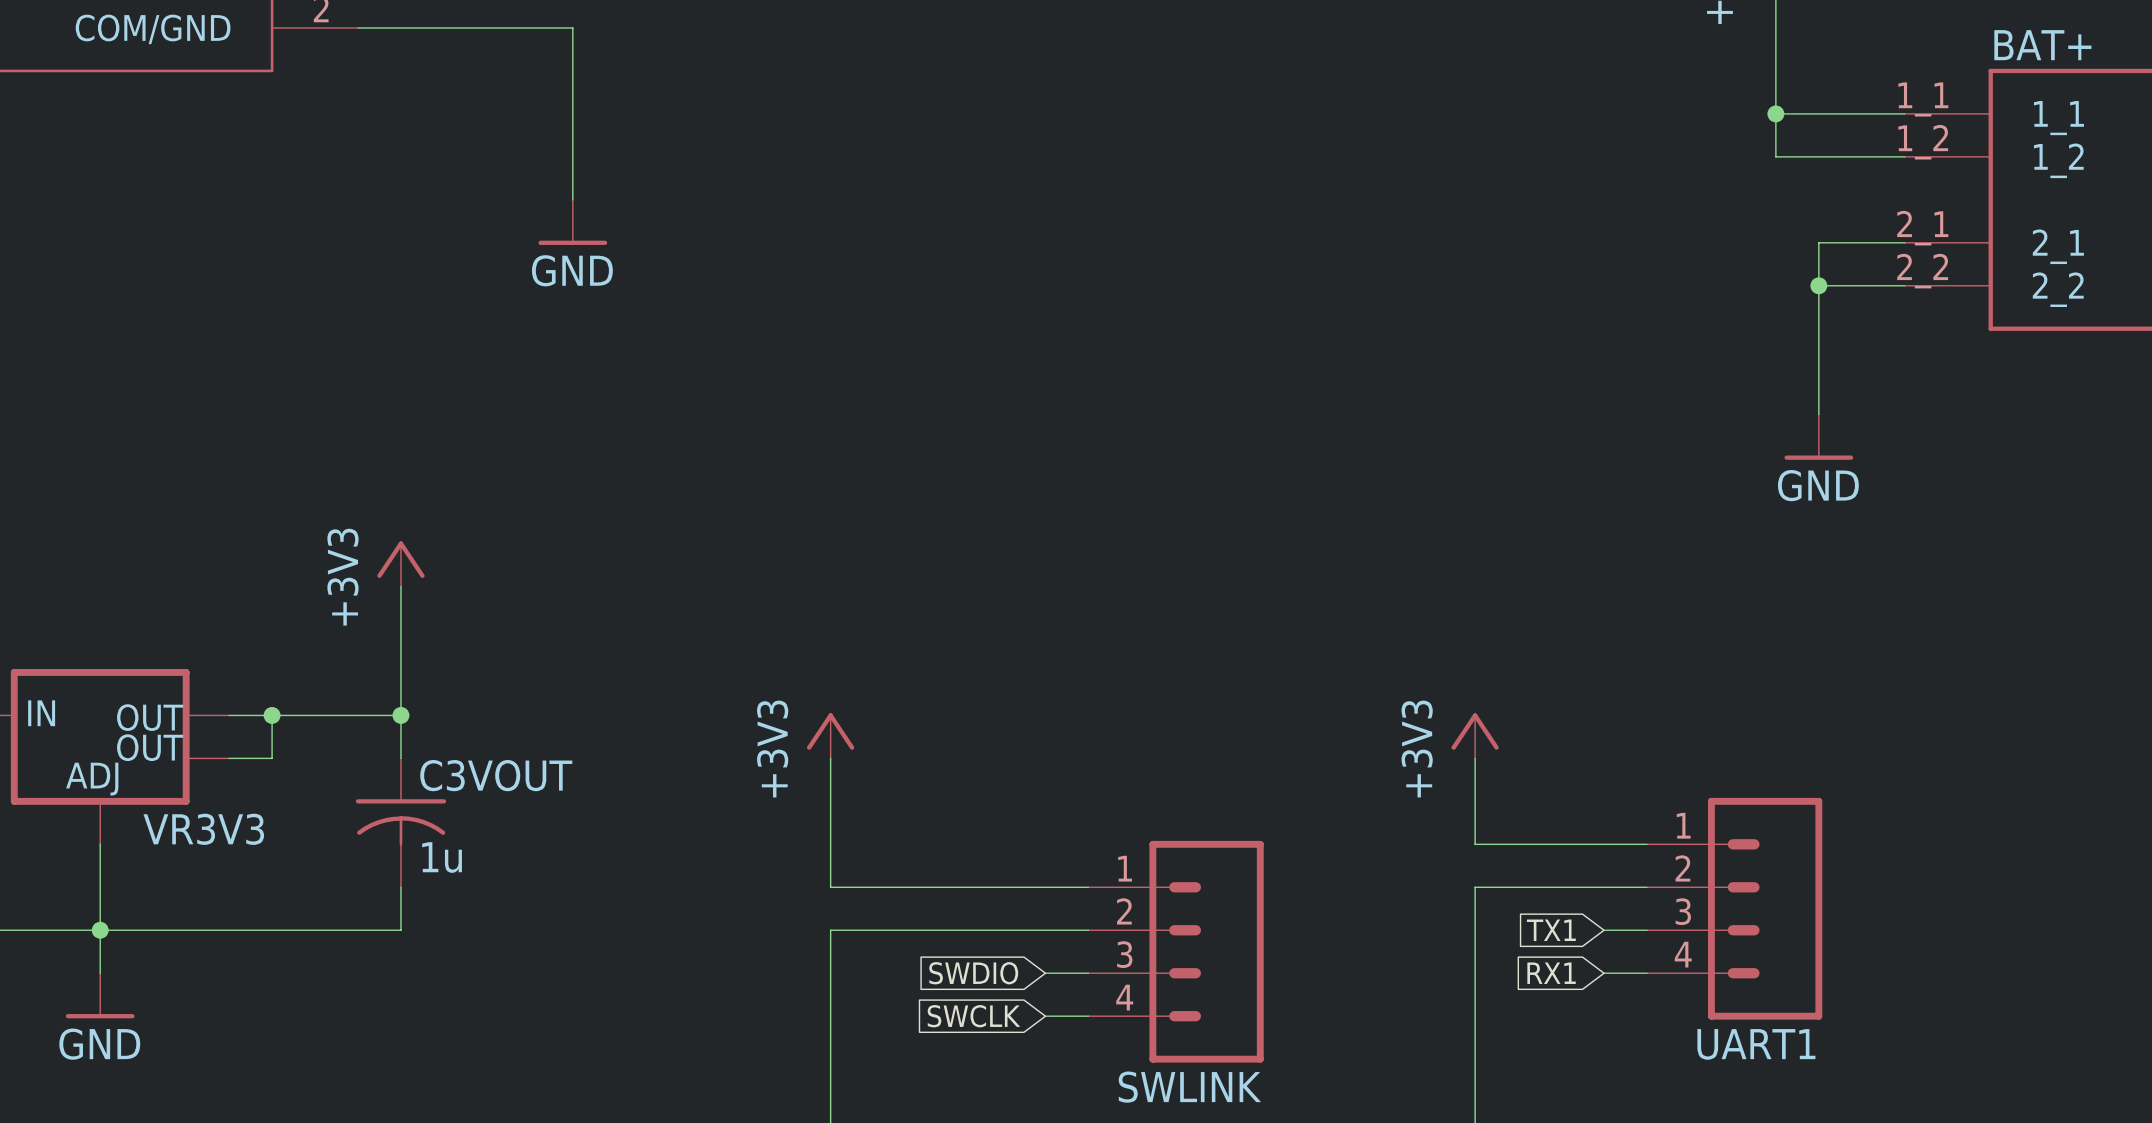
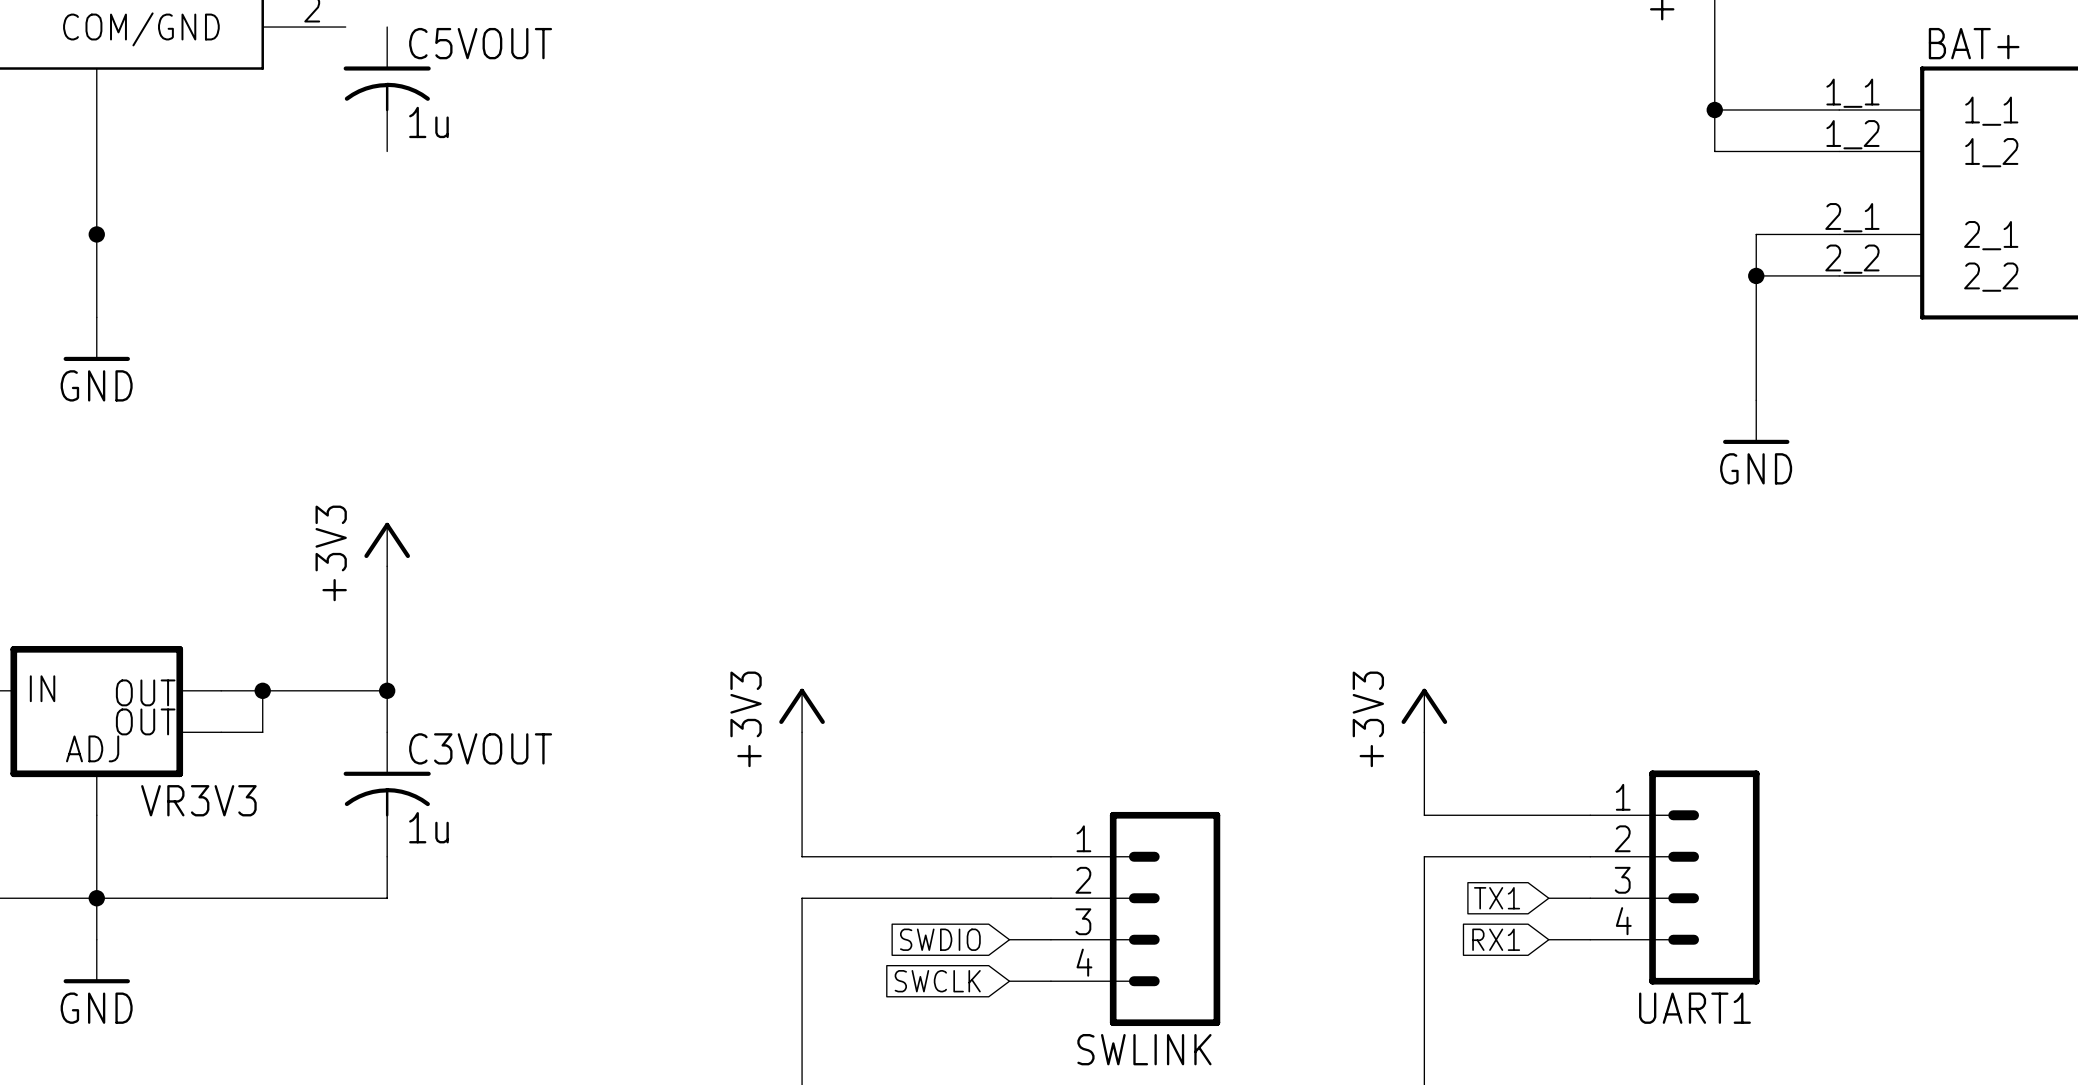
wire: (358, 27) (572, 27) (572, 199) -> none
wire: none -> (96, 68) (96, 317)
C5VOUT: none -> 1u (387, 89)
power symbol: GND (572, 222) -> none
junction: none -> (96, 234)
power symbol: none -> GND (96, 339)

